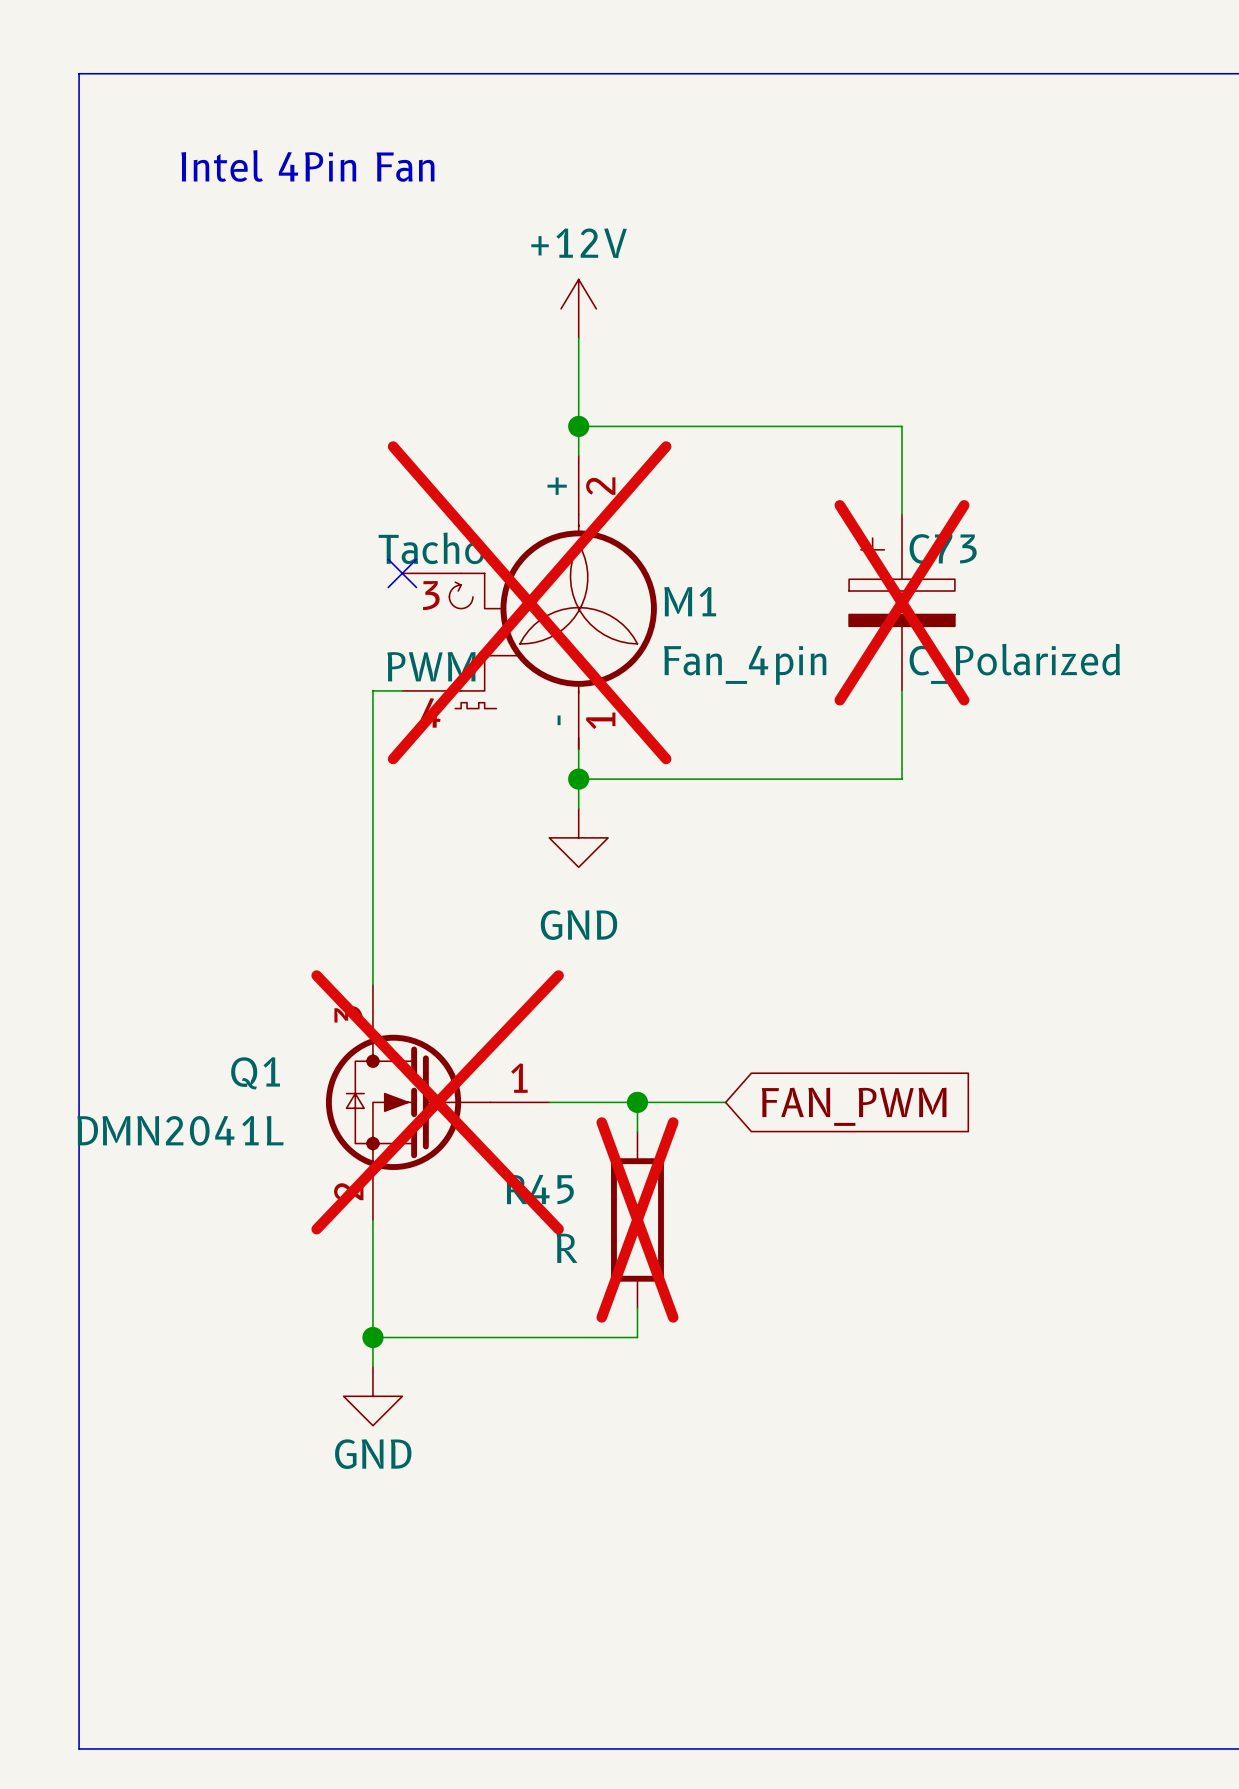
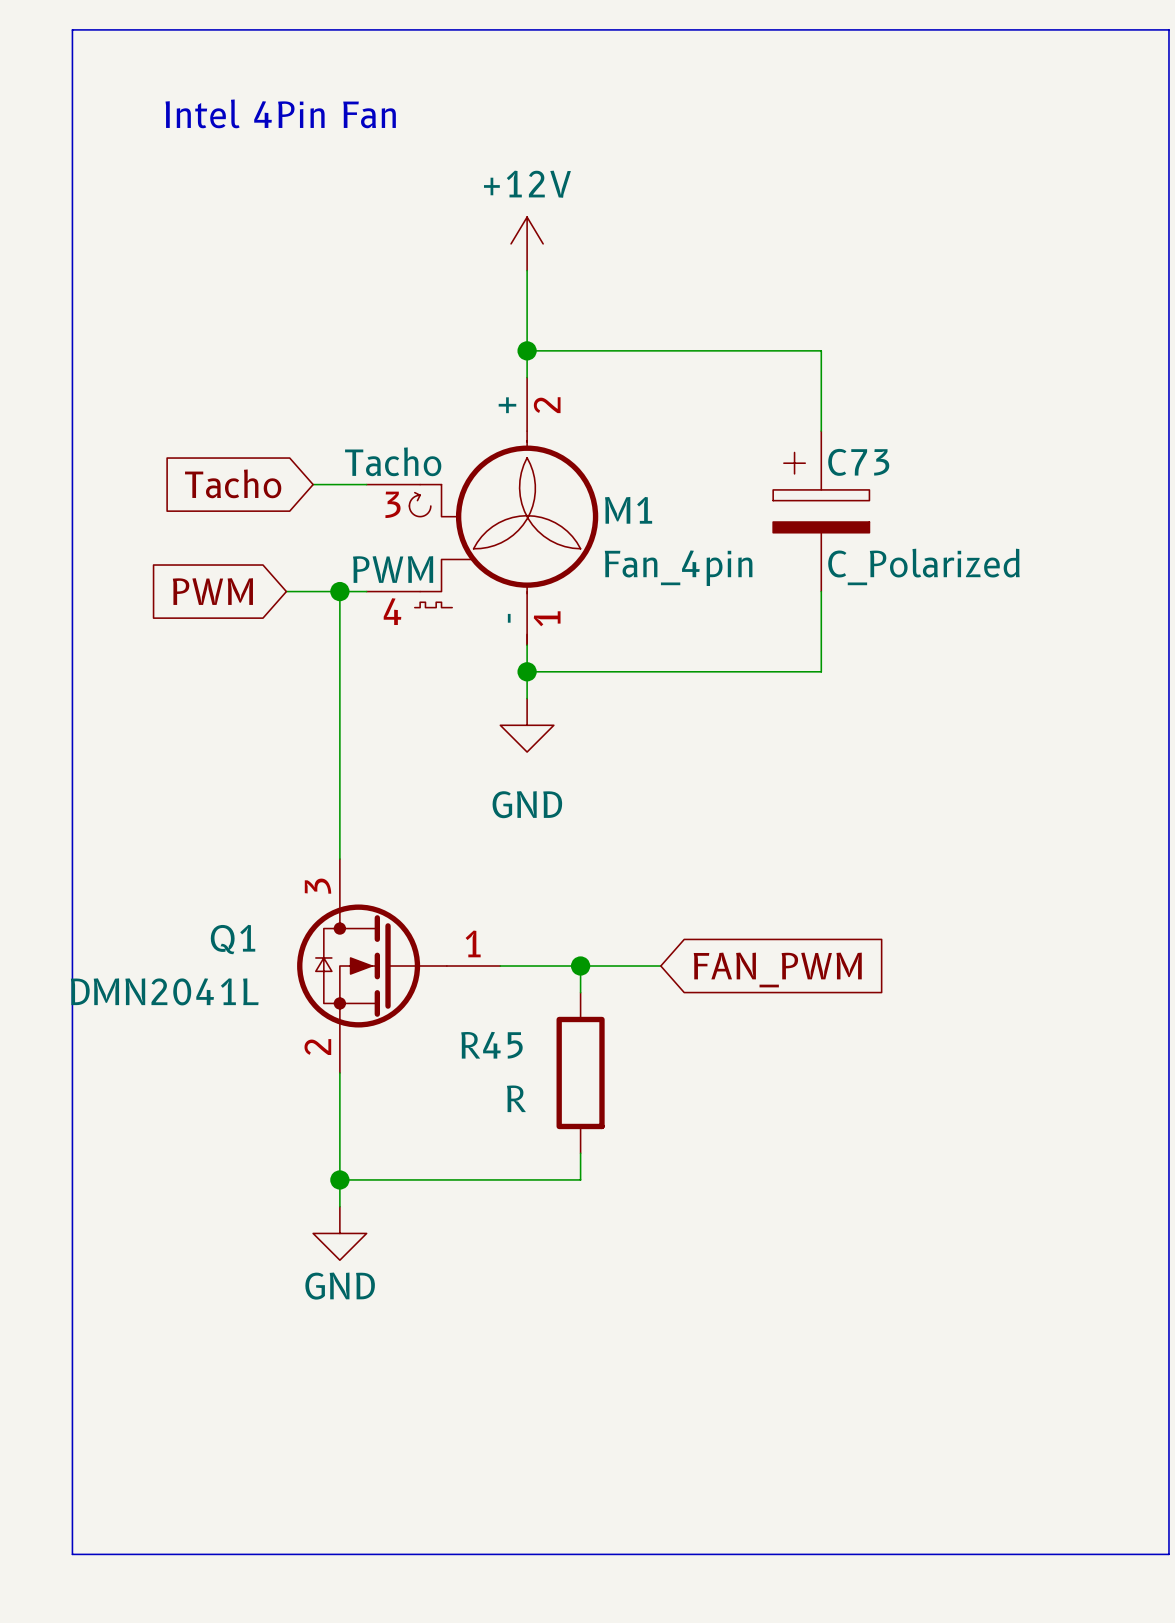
global label: none -> Tacho (233, 483)
wire: none -> (313, 484) (366, 484)
no-connect mark: (402, 573) -> none
M1 do-not-place cross: (529, 602) -> none
C73 do-not-place cross: (901, 602) -> none
global label: none -> PWM (212, 591)
wire: none -> (286, 591) (339, 591)
junction: none -> (339, 591)
Q1 do-not-place cross: (437, 1102) -> none
R45 do-not-place cross: (637, 1219) -> none

